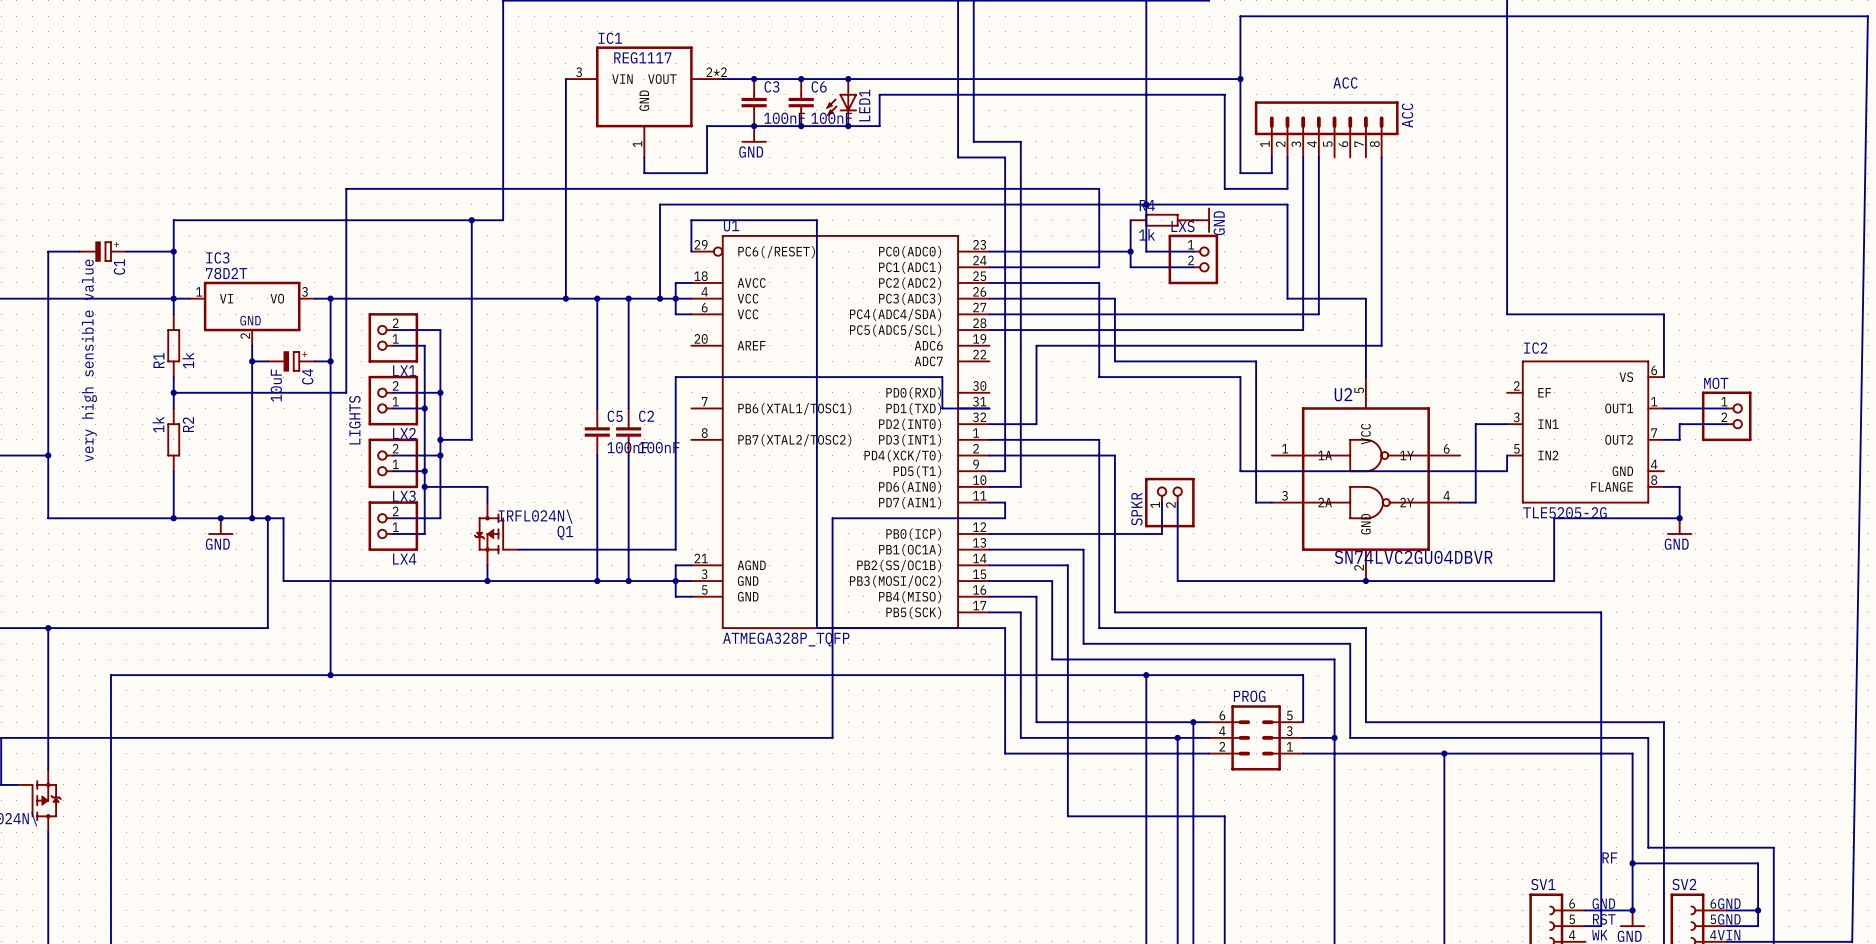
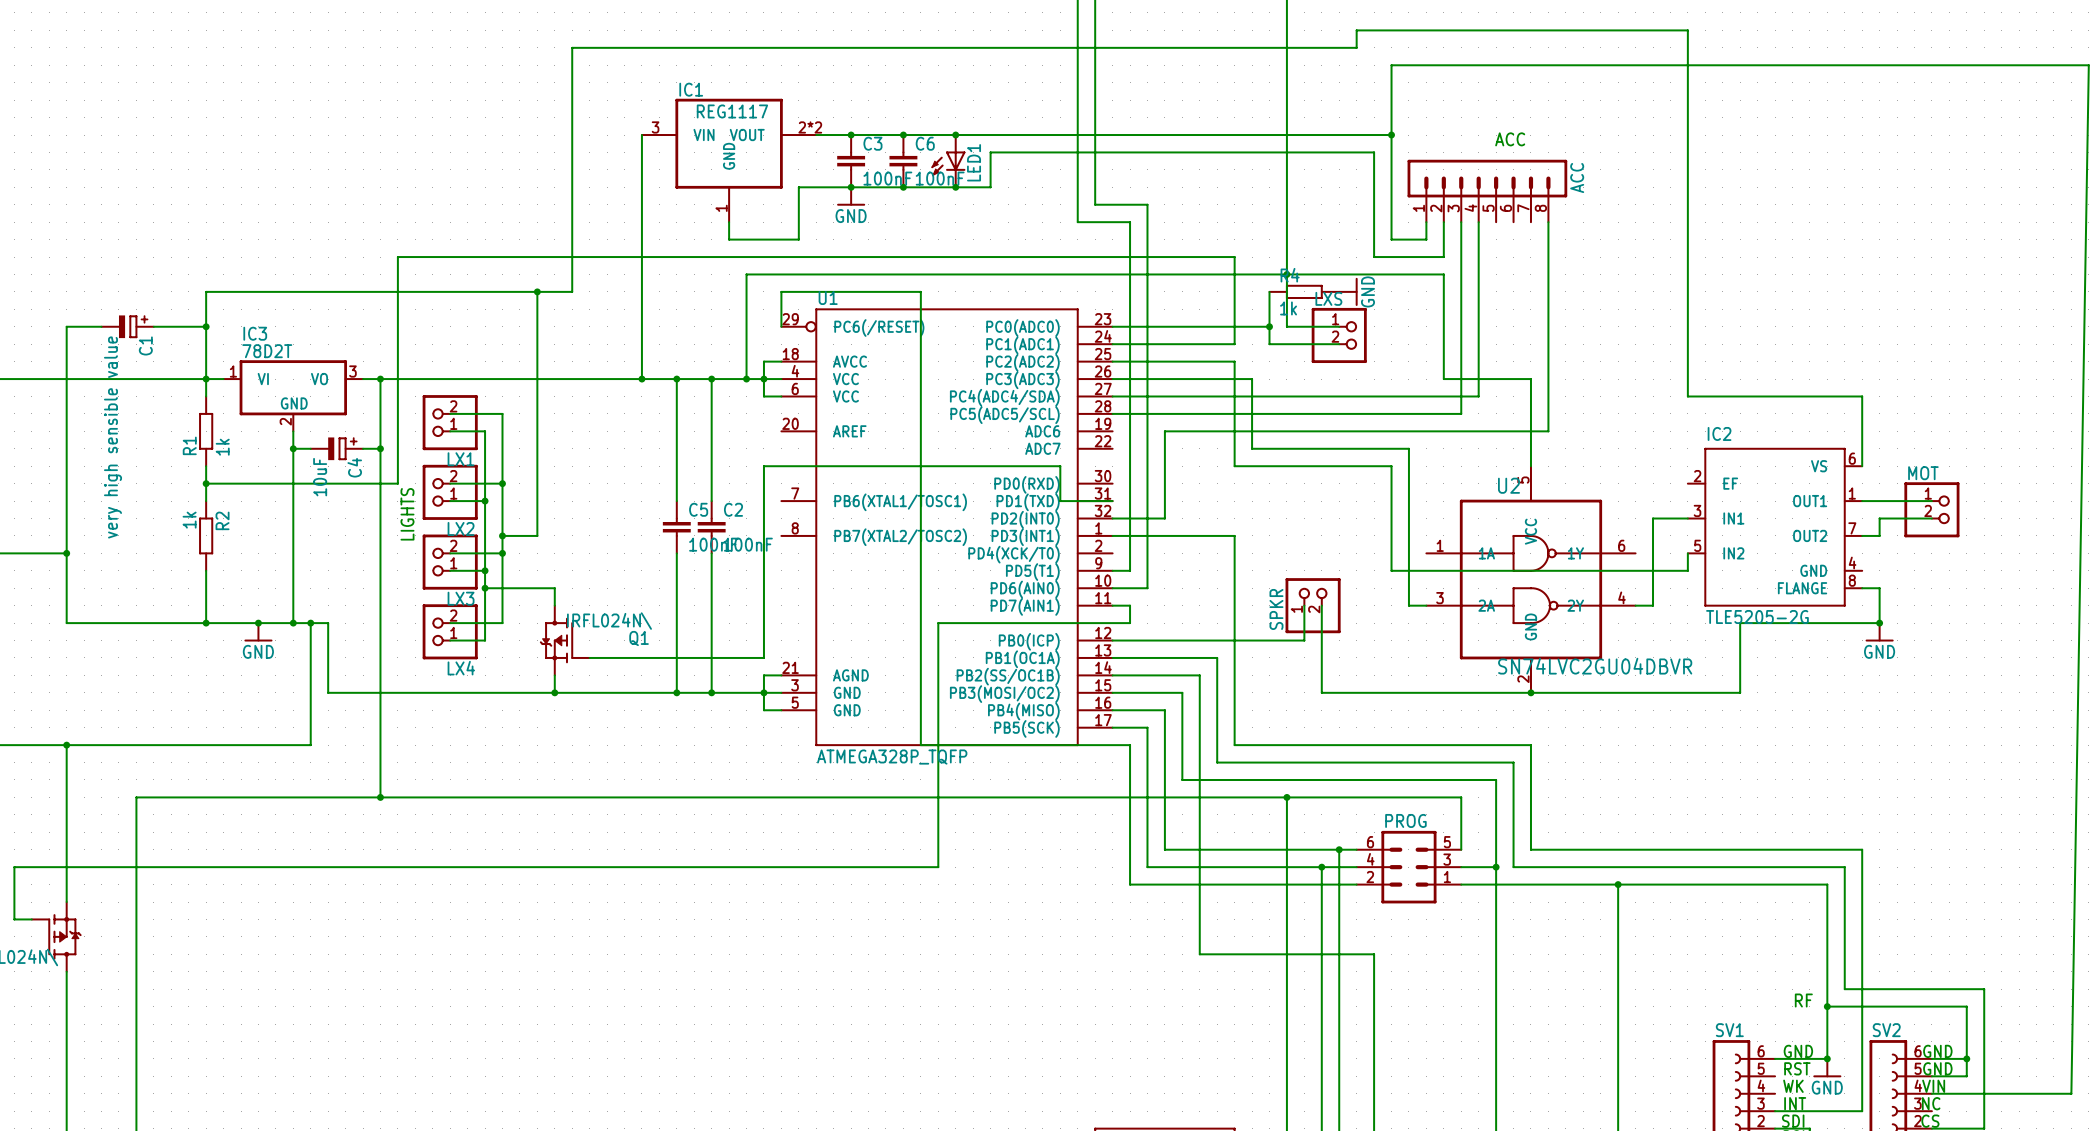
wire: (989, 455) (1114, 455) (1114, 612) (1601, 612) (1601, 926) (1585, 926) -> none

